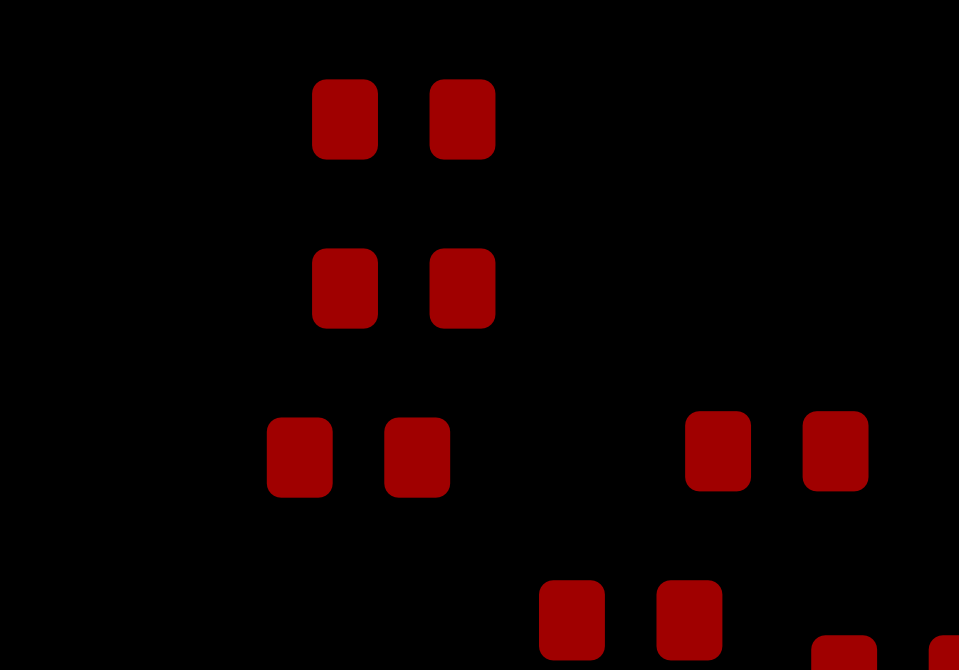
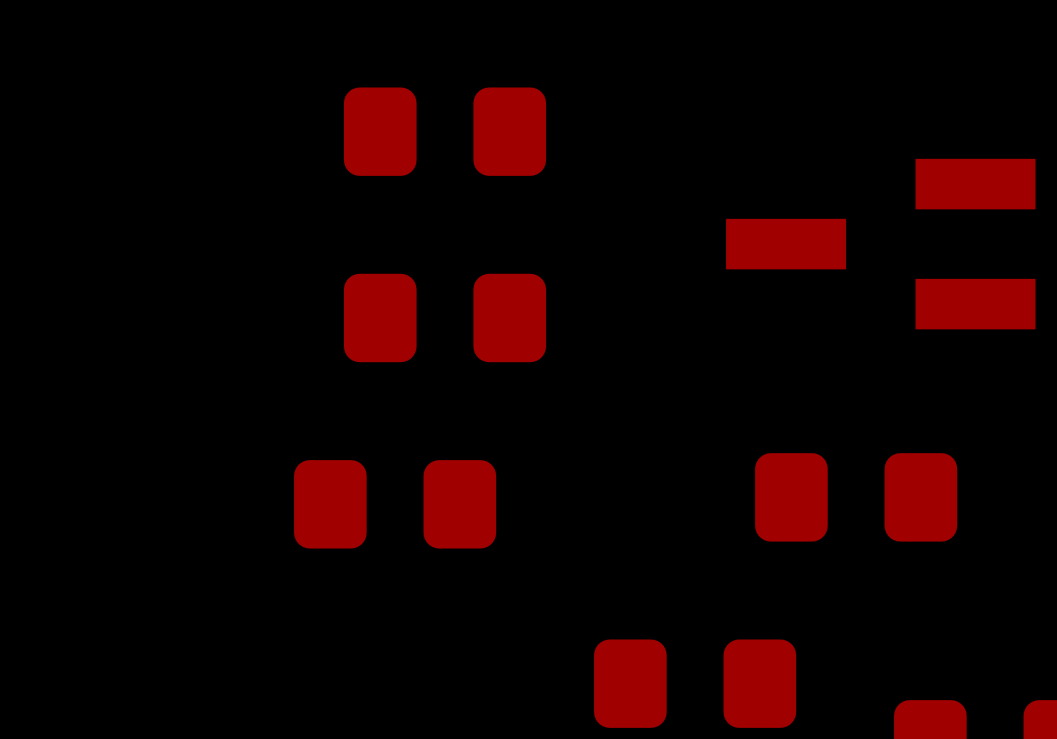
part: none -> (880, 244)

